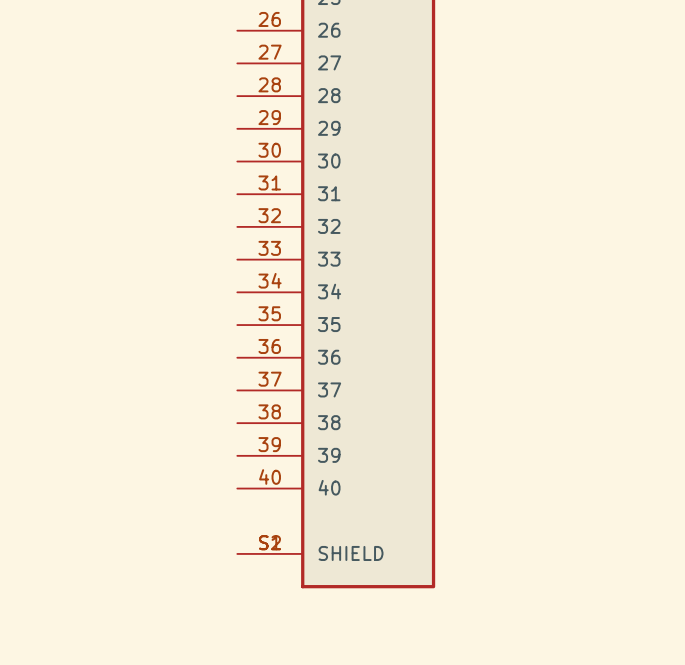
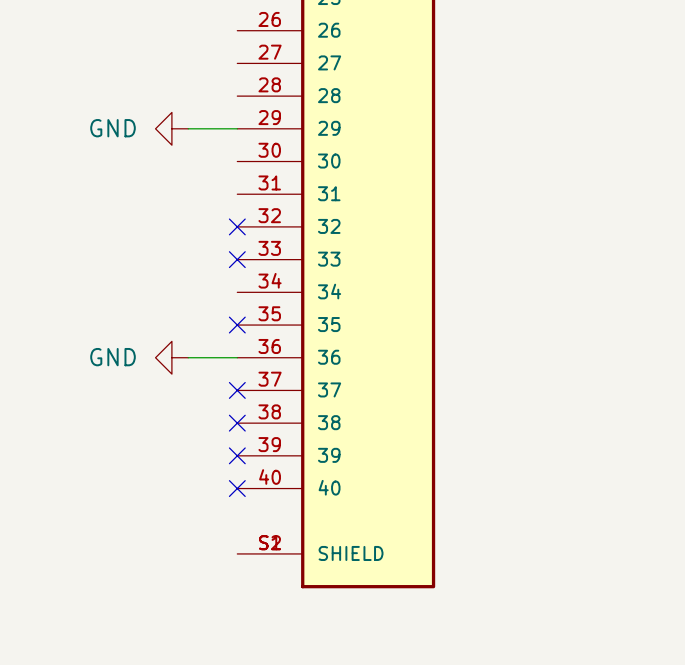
power symbol: none -> GND (171, 128)
wire: none -> (188, 128) (237, 128)
no-connect mark: none -> (237, 226)
no-connect mark: none -> (237, 259)
no-connect mark: none -> (237, 325)
power symbol: none -> GND (171, 357)
wire: none -> (188, 357) (237, 357)
no-connect mark: none -> (237, 390)
no-connect mark: none -> (237, 423)
no-connect mark: none -> (237, 455)
no-connect mark: none -> (237, 488)

